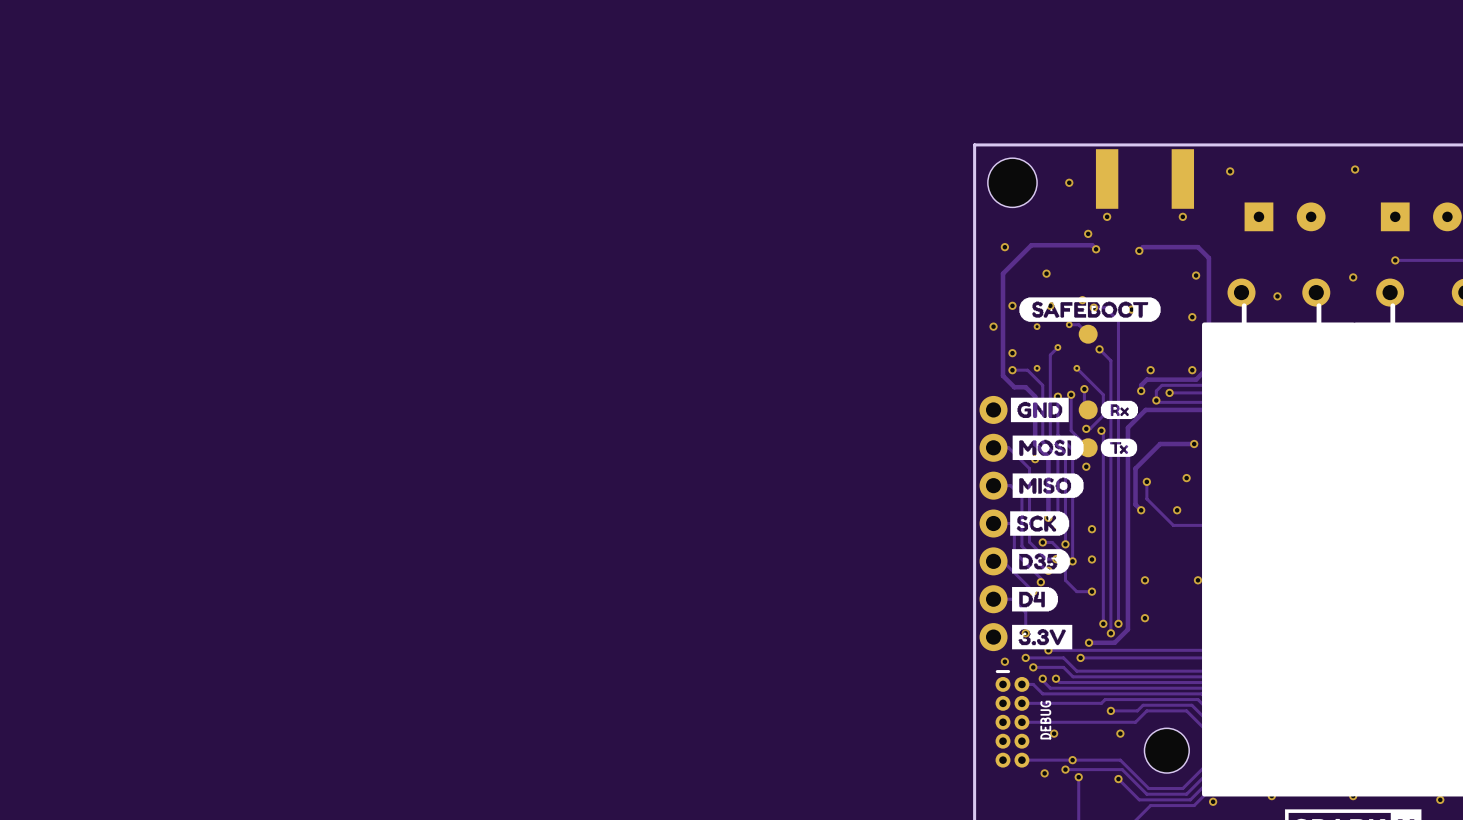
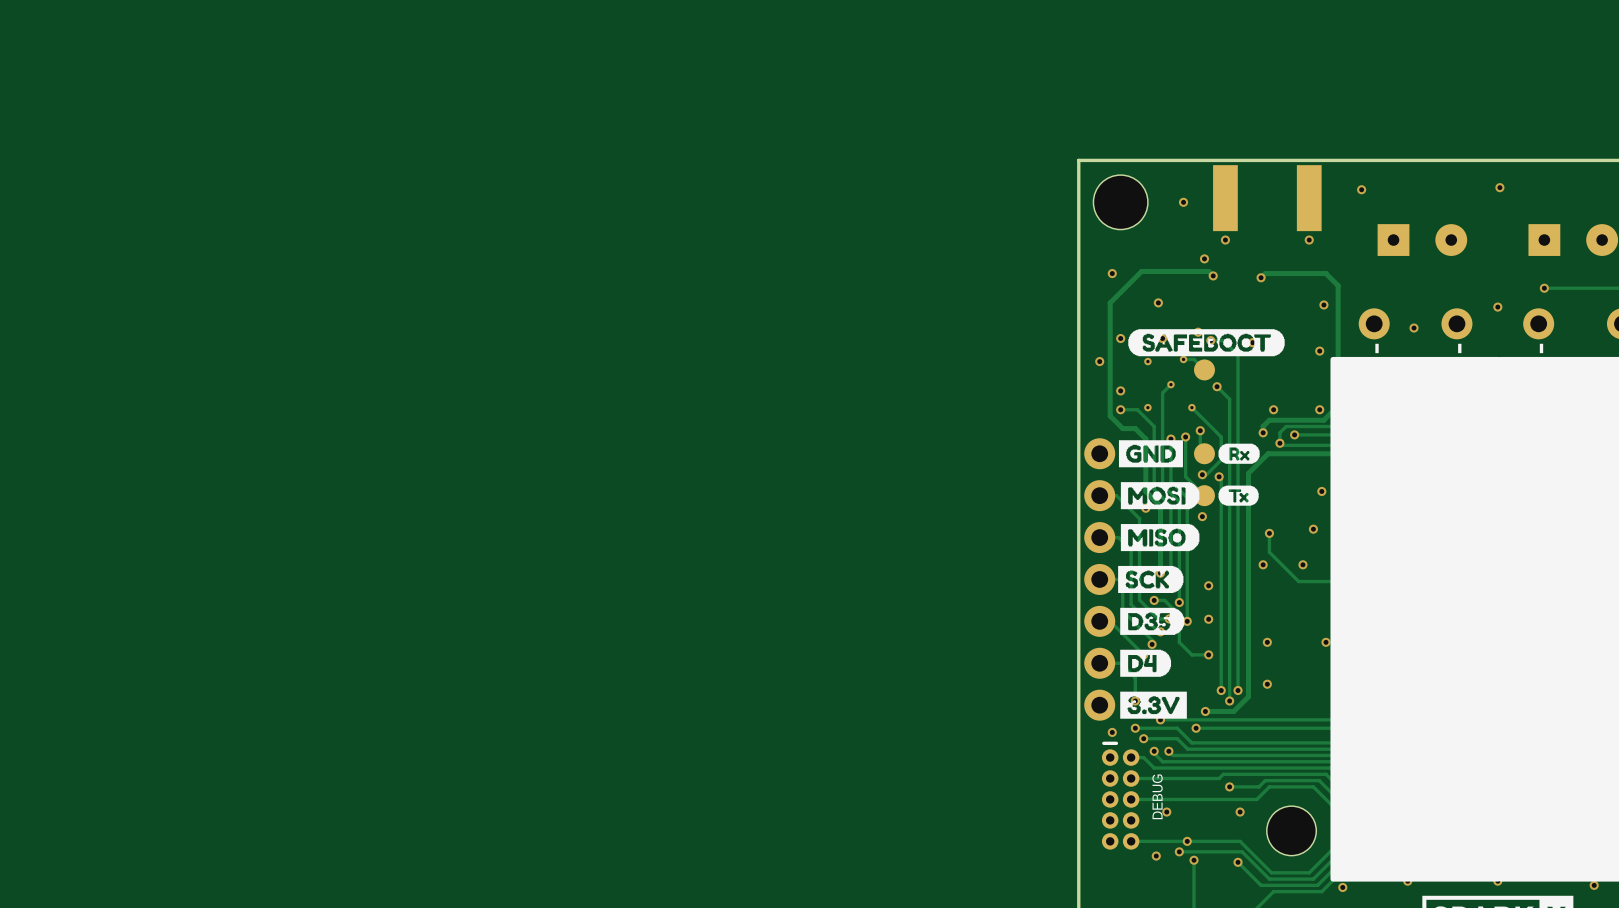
track: (1194, 444) (1160, 444) (1135, 468) (1135, 504) (1141, 510) -> none

